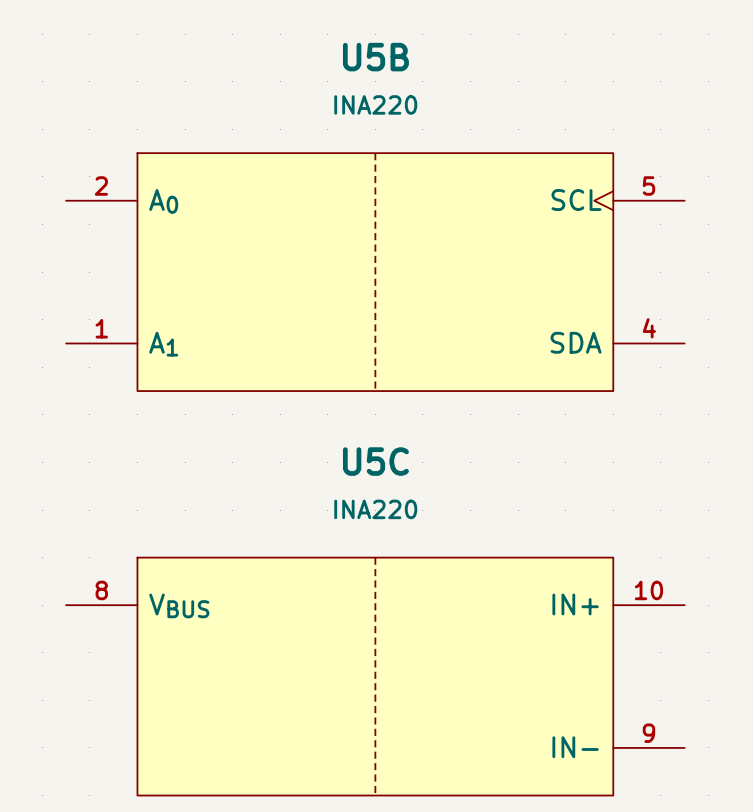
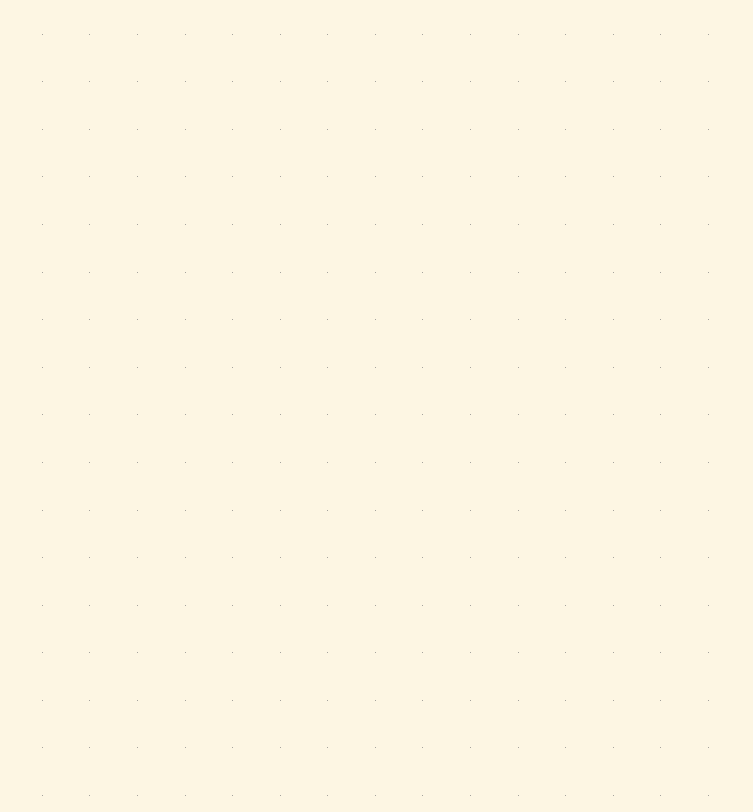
U5B: INA220 (375, 272) -> none
U5C: INA220 (375, 676) -> none

